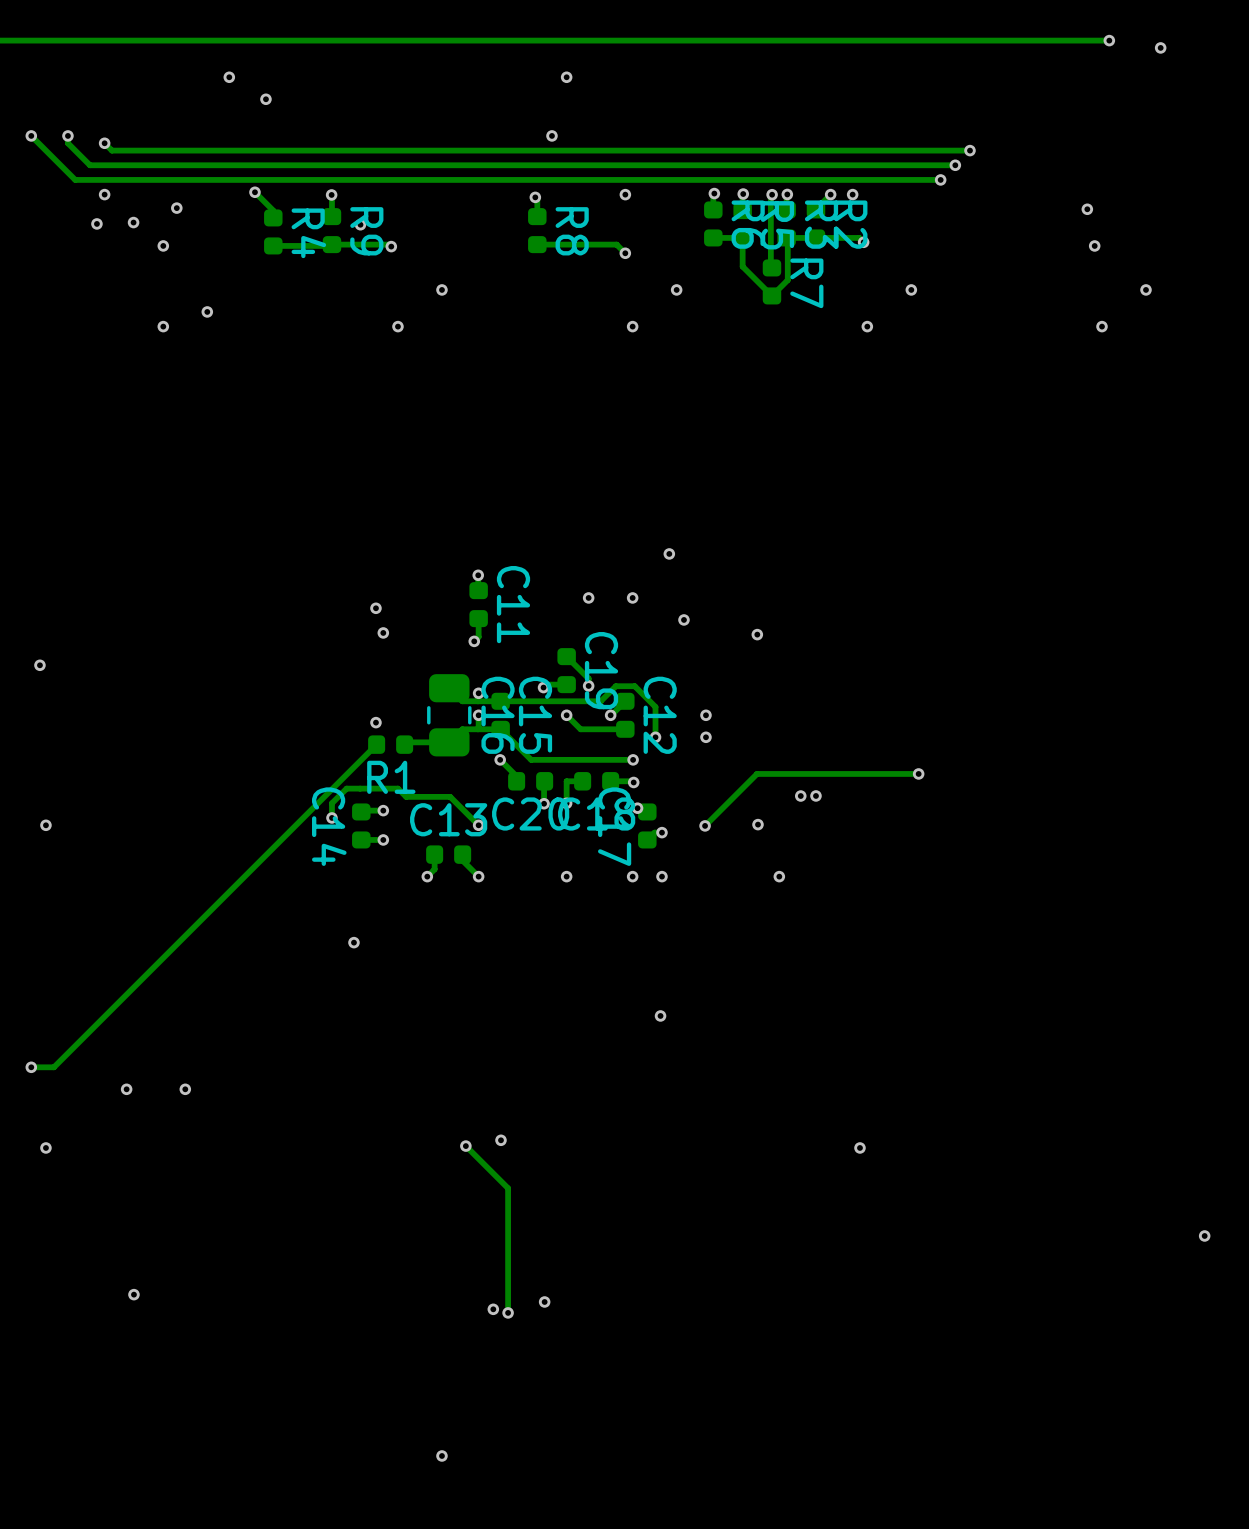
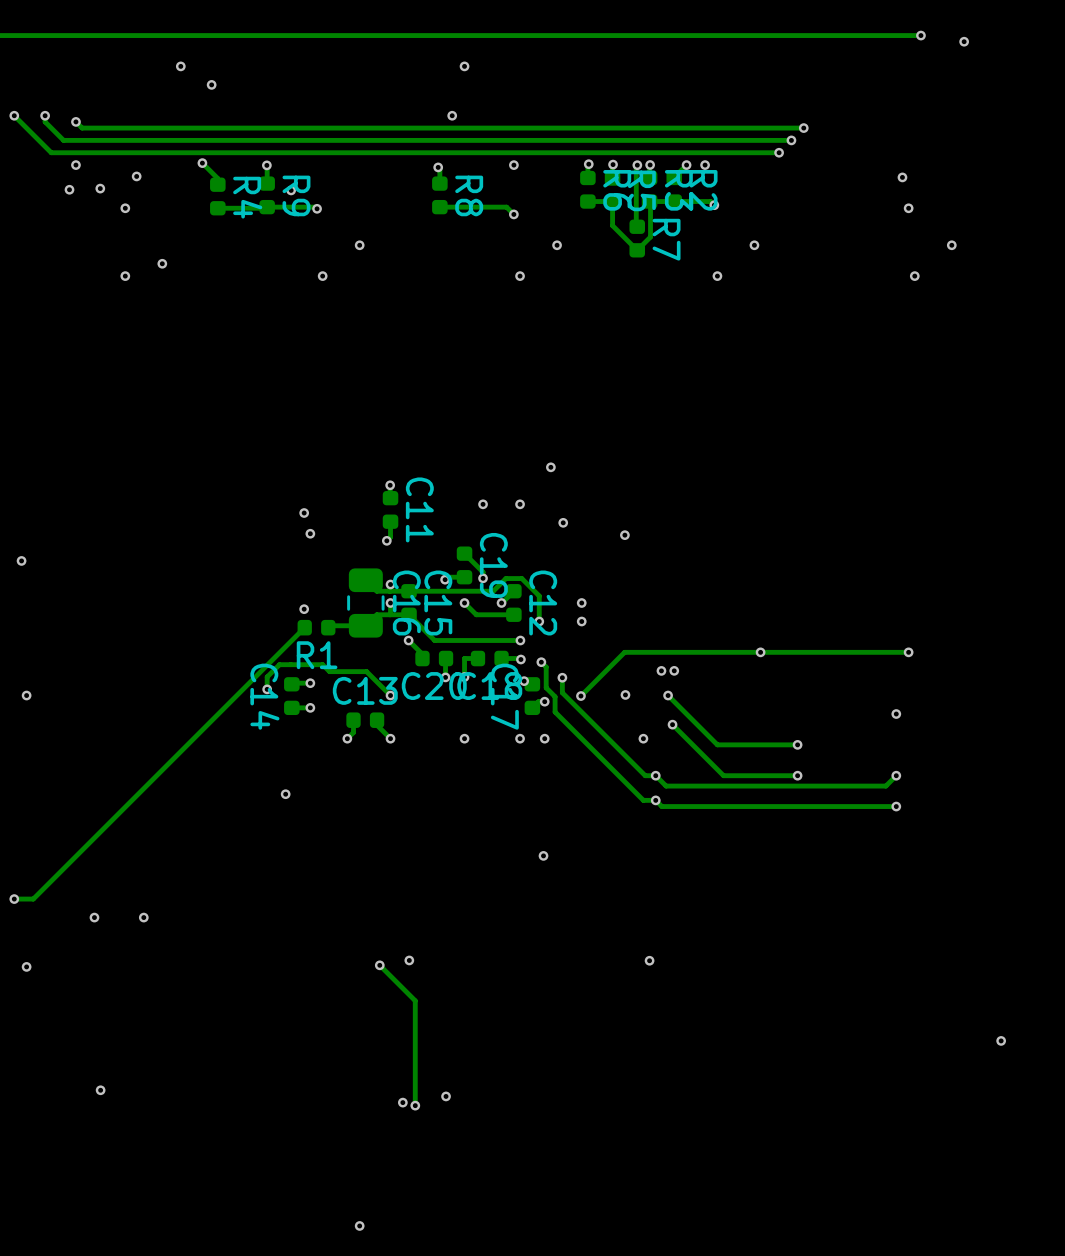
track: none -> (908, 652) (760, 652)
via: none -> (908, 652)
track: none -> (541, 662) (546, 667) (546, 687) (555, 696) (555, 712) (643, 800) (655, 800) (661, 806) (896, 806)
via: none -> (541, 662)
track: none -> (562, 677) (562, 692) (645, 775) (655, 775) (666, 786) (885, 786) (896, 775)
via: none -> (562, 677)
track: none -> (668, 695) (717, 744) (797, 744)
via: none -> (668, 695)
via: none -> (896, 714)
track: none -> (672, 724) (723, 775) (797, 775)
via: none -> (672, 724)
via: none -> (797, 744)
via: none -> (655, 775)
via: none -> (797, 775)
via: none -> (896, 775)
via: none -> (655, 800)
via: none -> (896, 806)
via position: (859, 1147) -> (649, 960)

